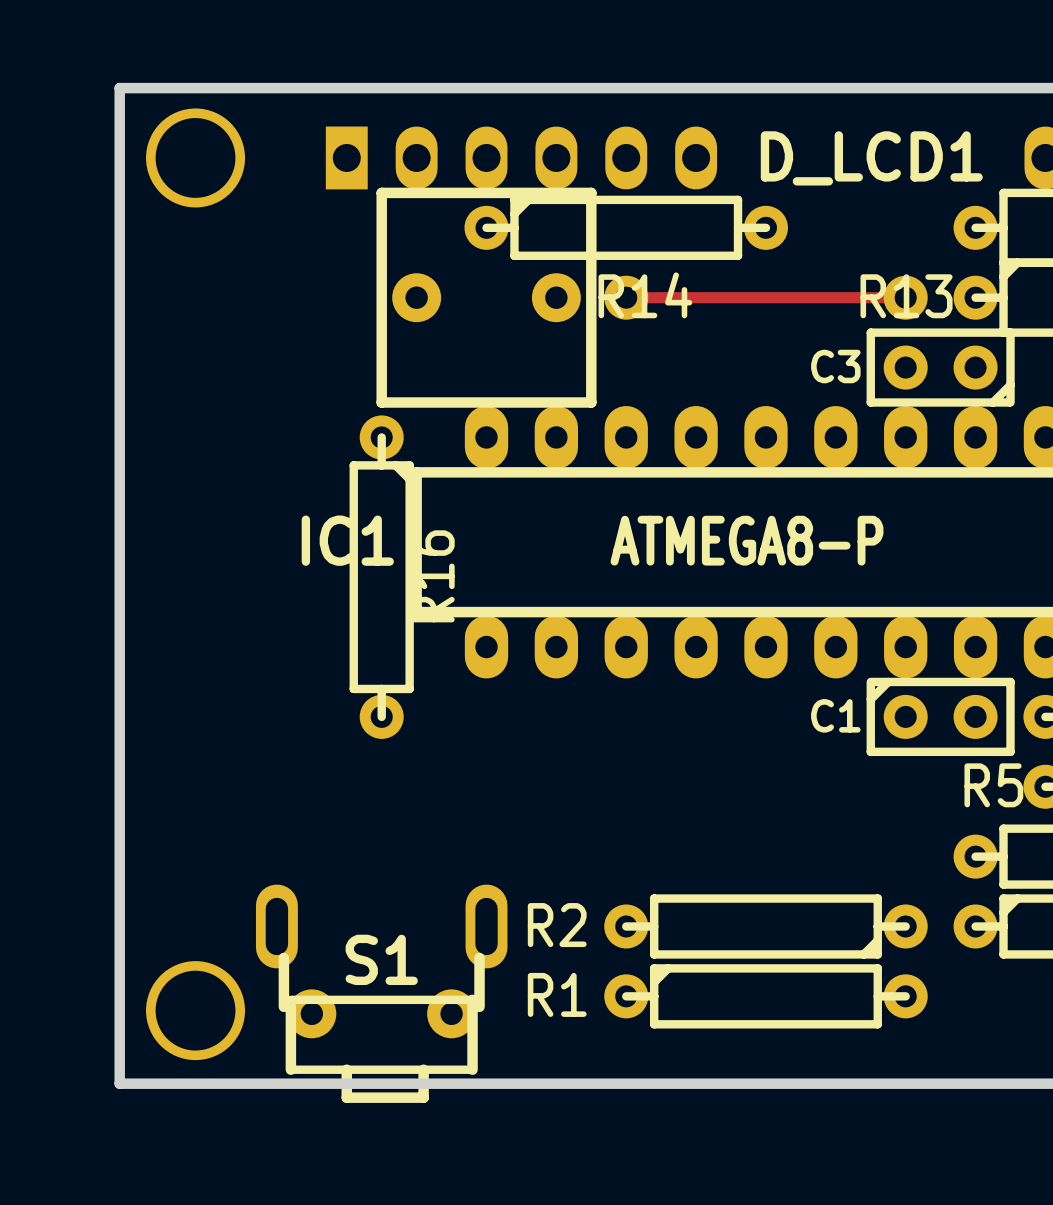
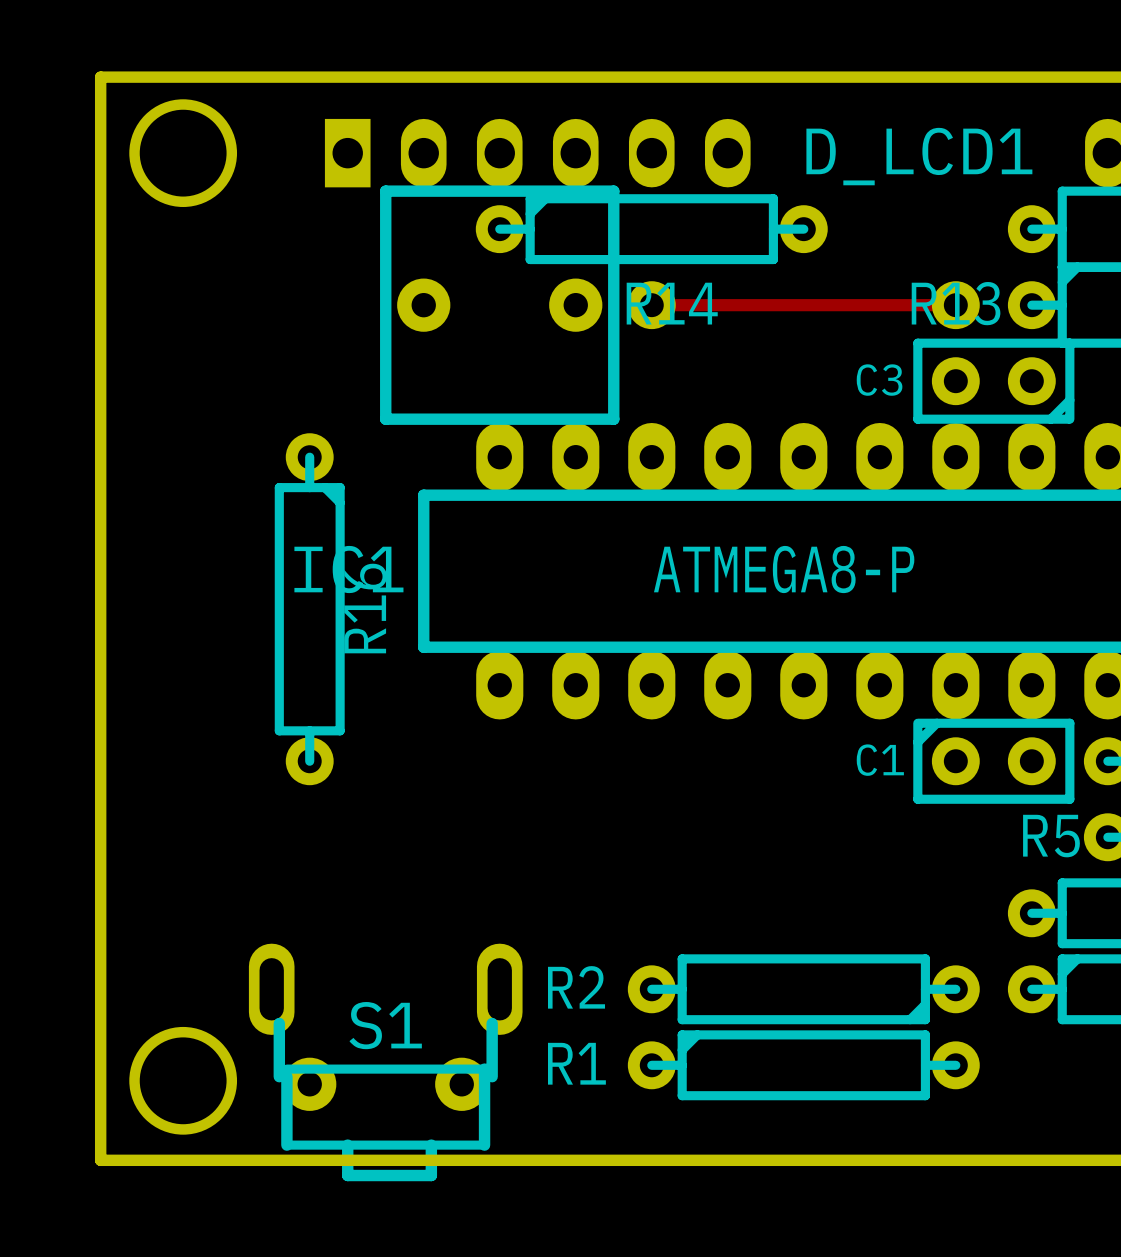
R16 position: (381, 577) -> (309, 609)

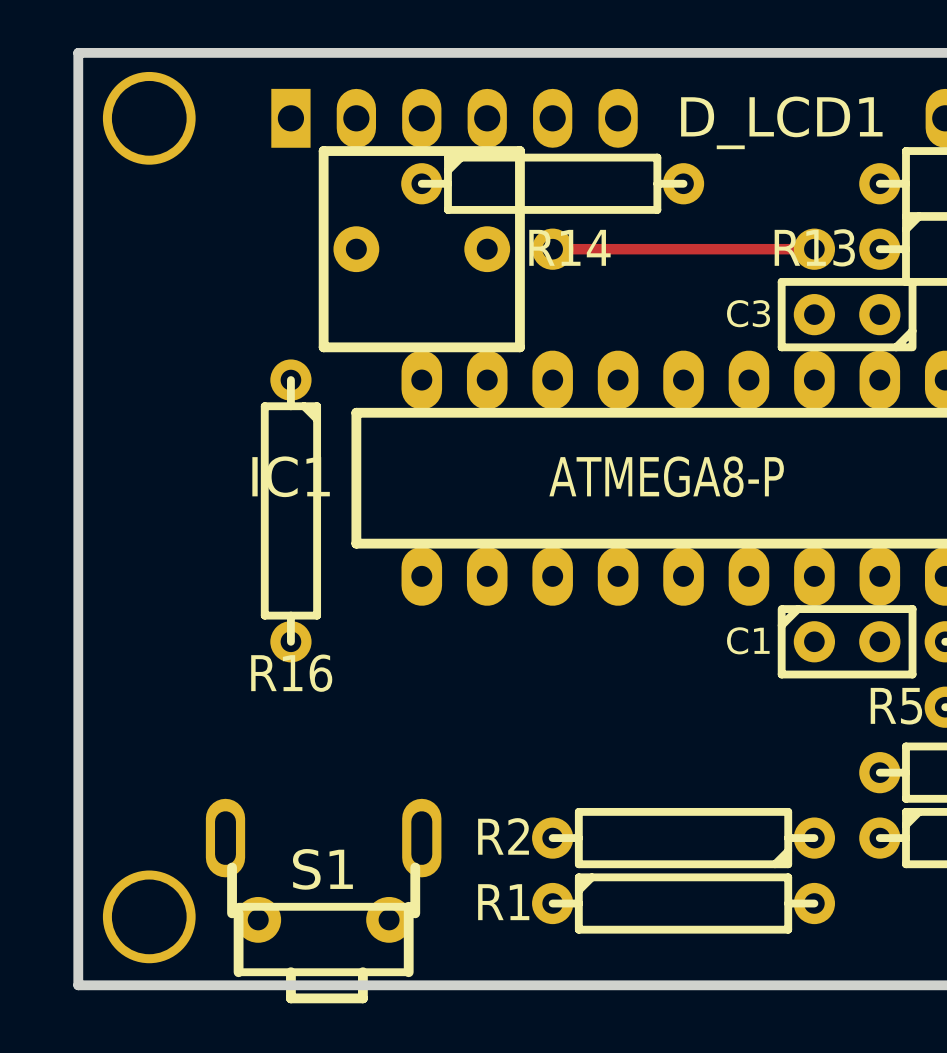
R16 name rotation: 0° (365, 608) -> 90° clockwise (291, 673)
R16 name position: R16 (365, 608) -> R16 (291, 673)
R16 position: (309, 609) -> (290, 510)
R2 name position: R2 (576, 987) -> R2 (503, 836)
R1 name position: R1 (576, 1063) -> R1 (503, 902)

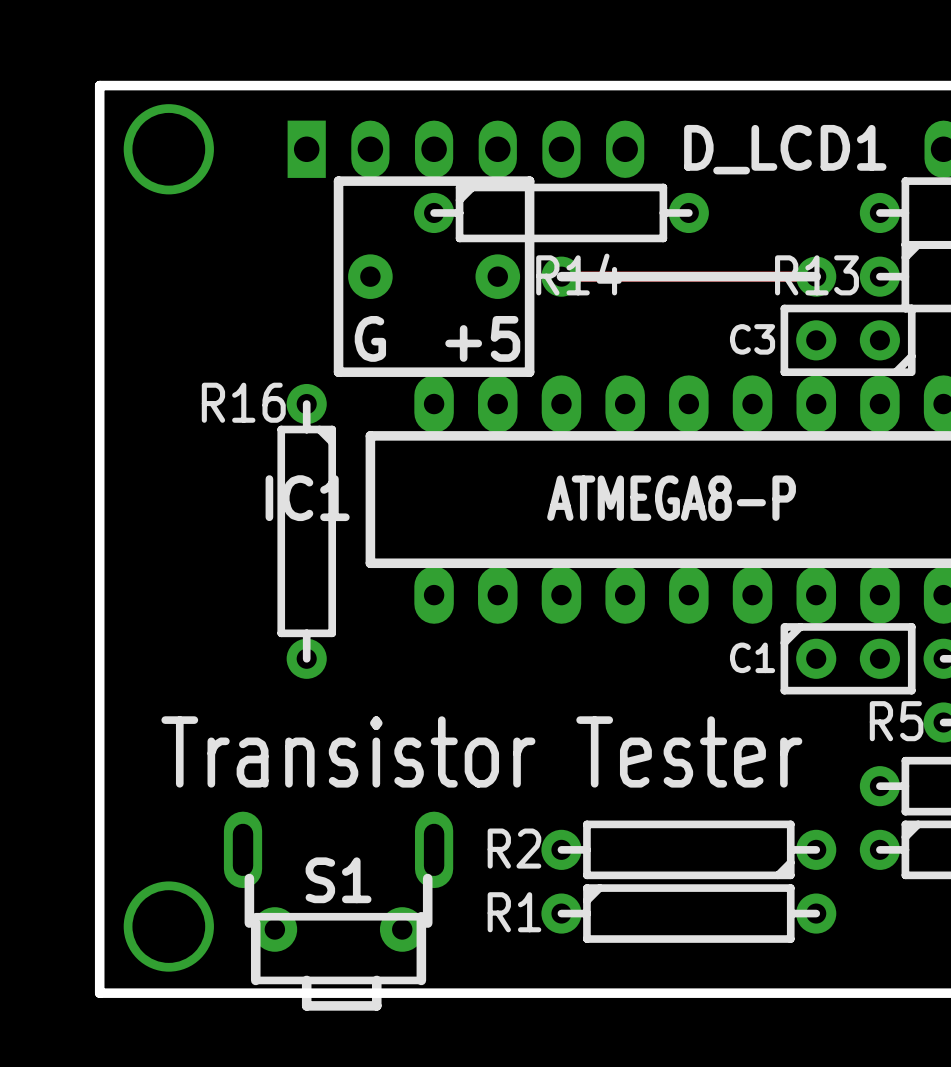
line: none -> (561, 276) (816, 276)
text: none -> G (370, 338)
text: none -> +5 (482, 338)
R16 name position: R16 (291, 673) -> R16 (243, 402)
text: none -> Transistor Tester (481, 751)

